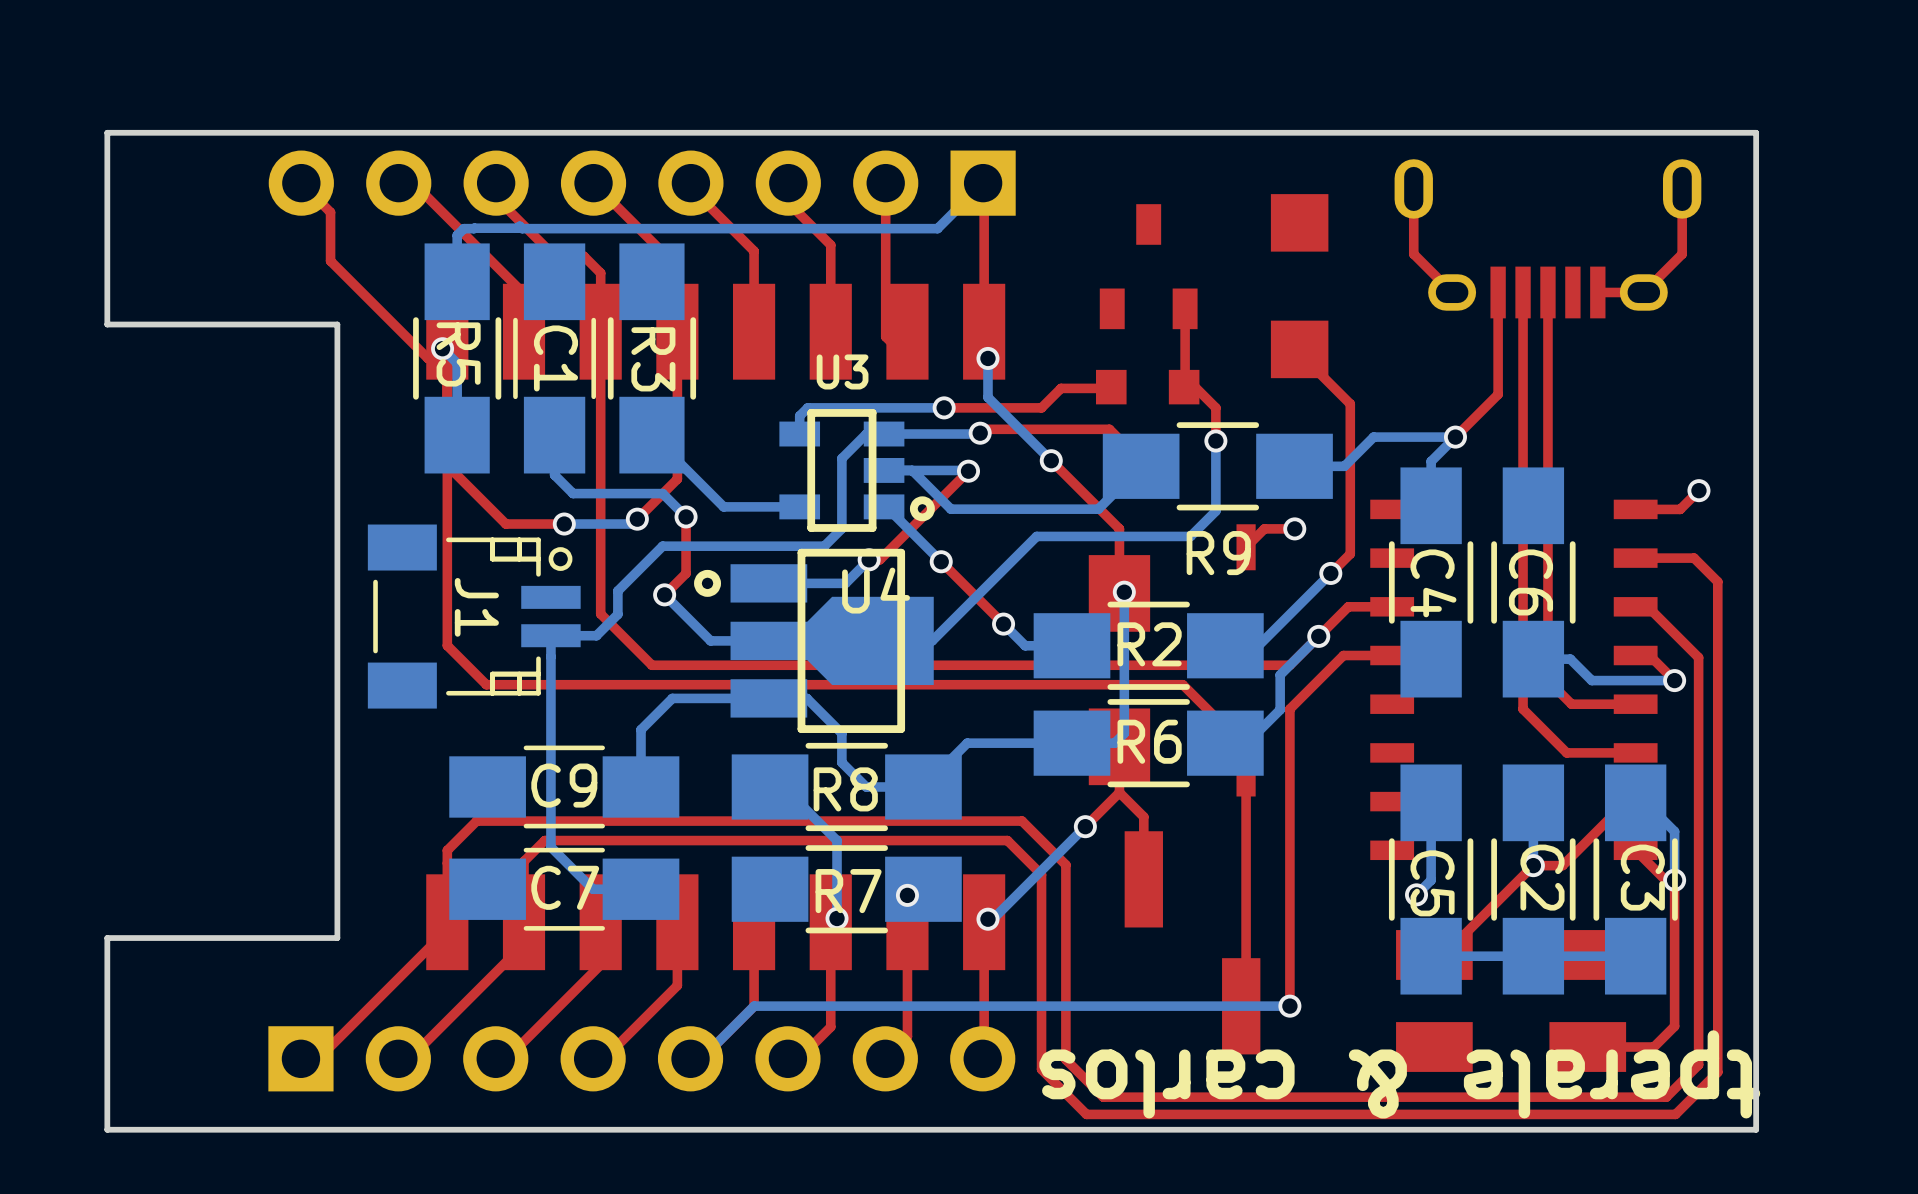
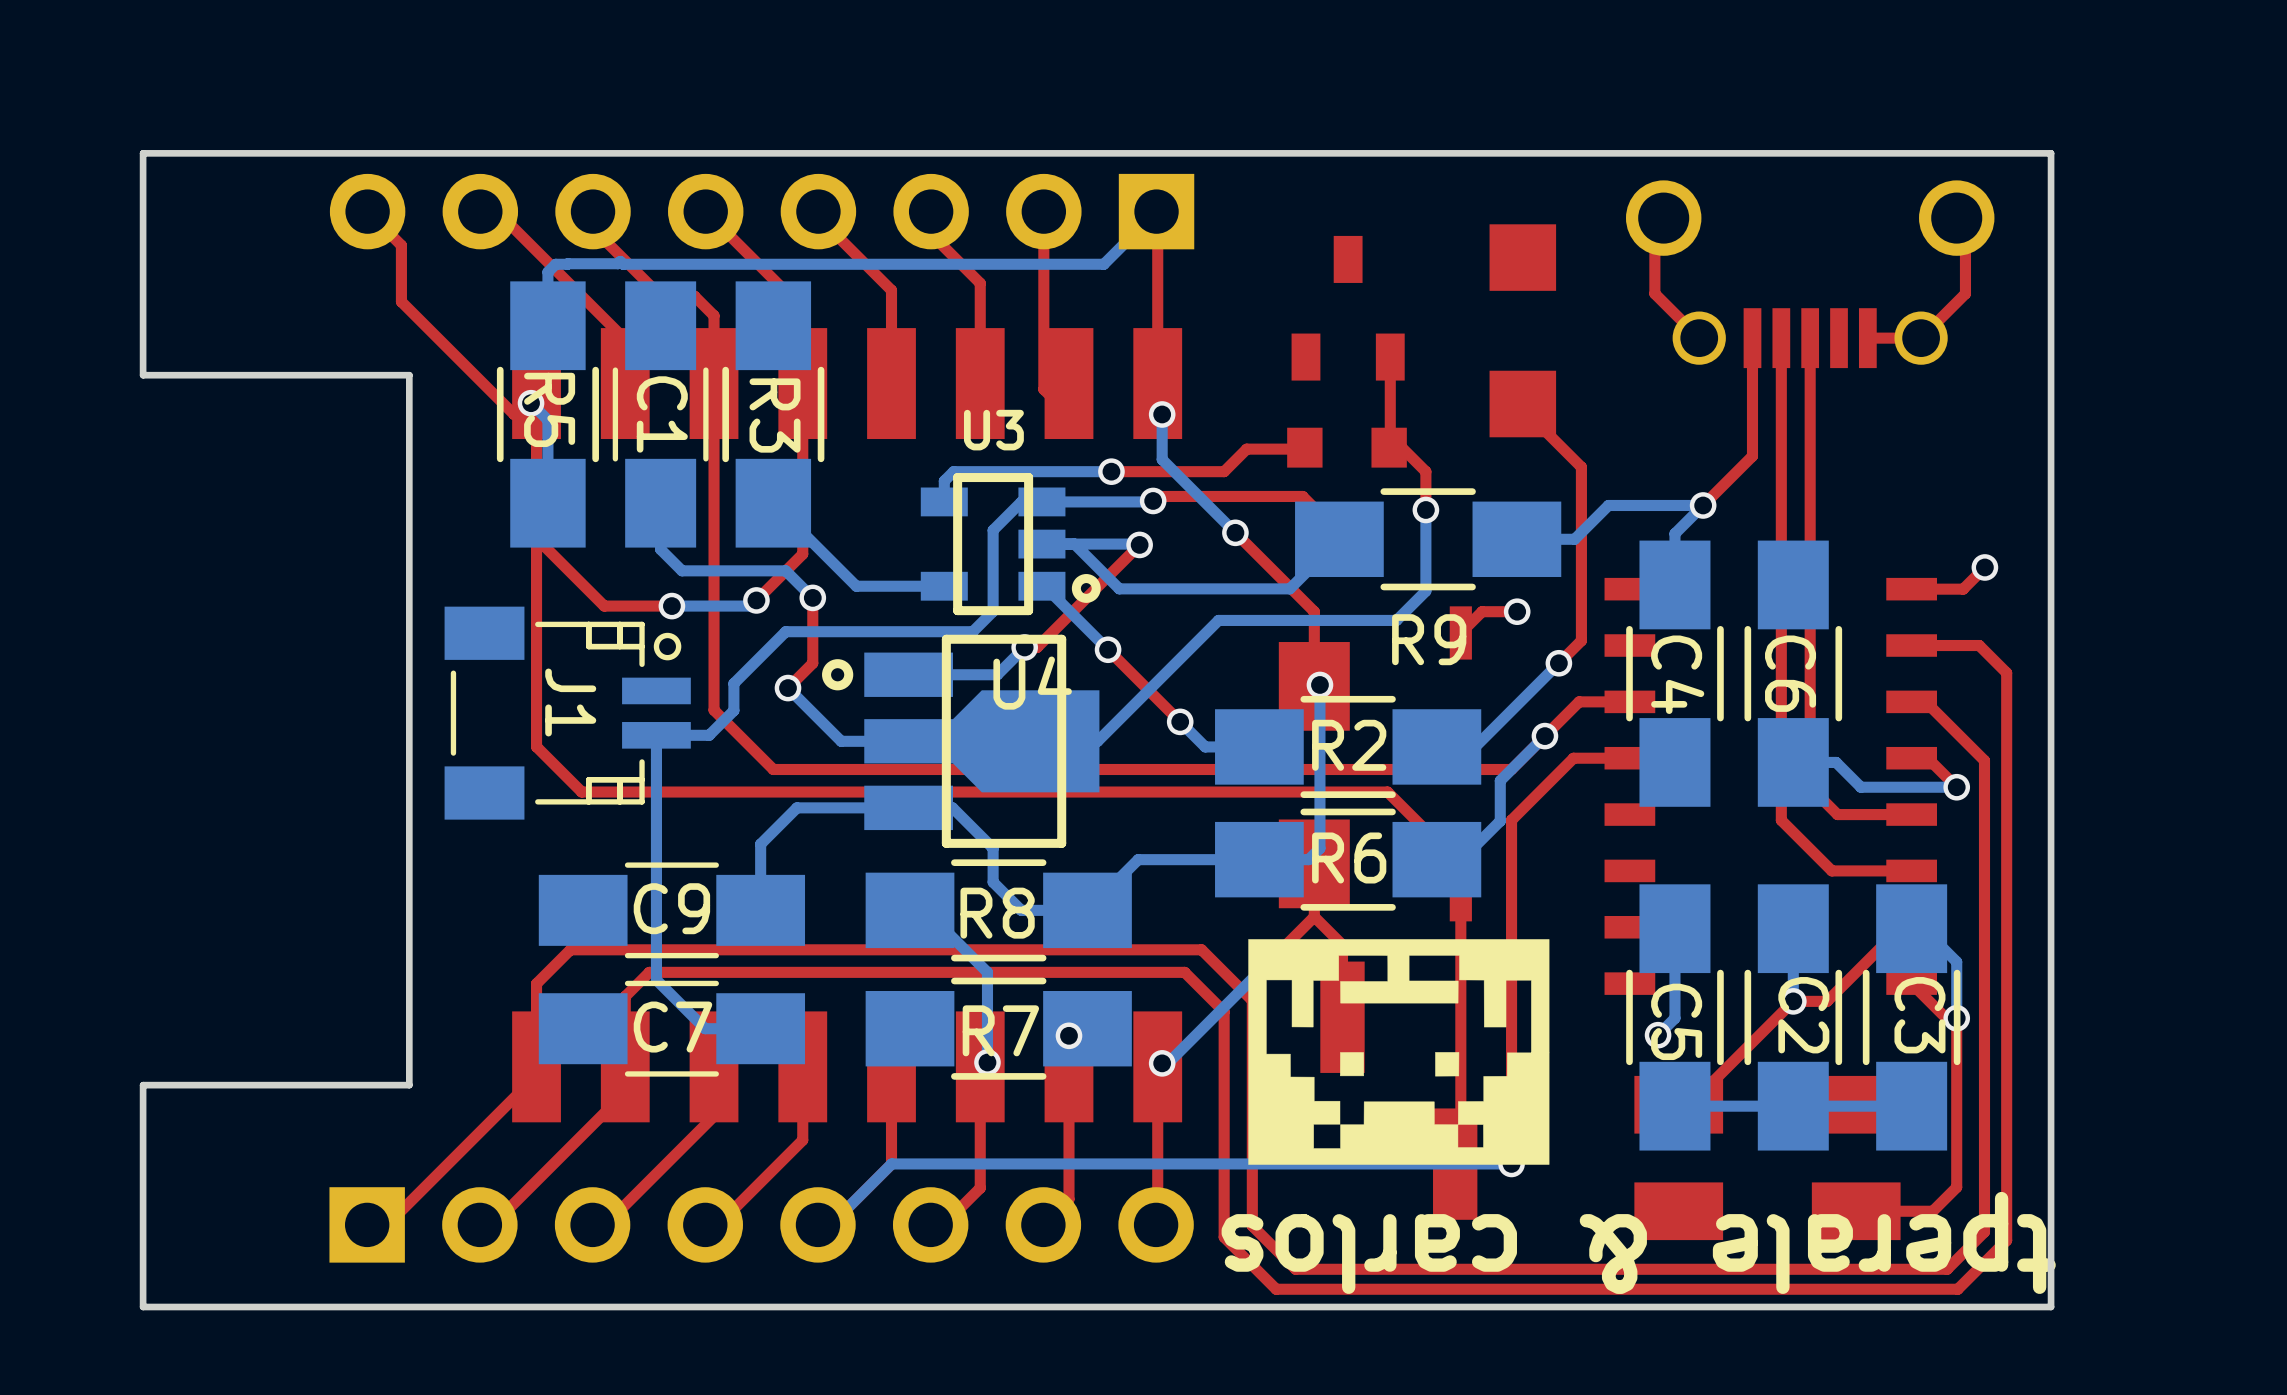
part footprint: [1394, 159, 1702, 319] -> [1625, 180, 1995, 369]
drawing: none -> [1248, 939, 1550, 1165]

